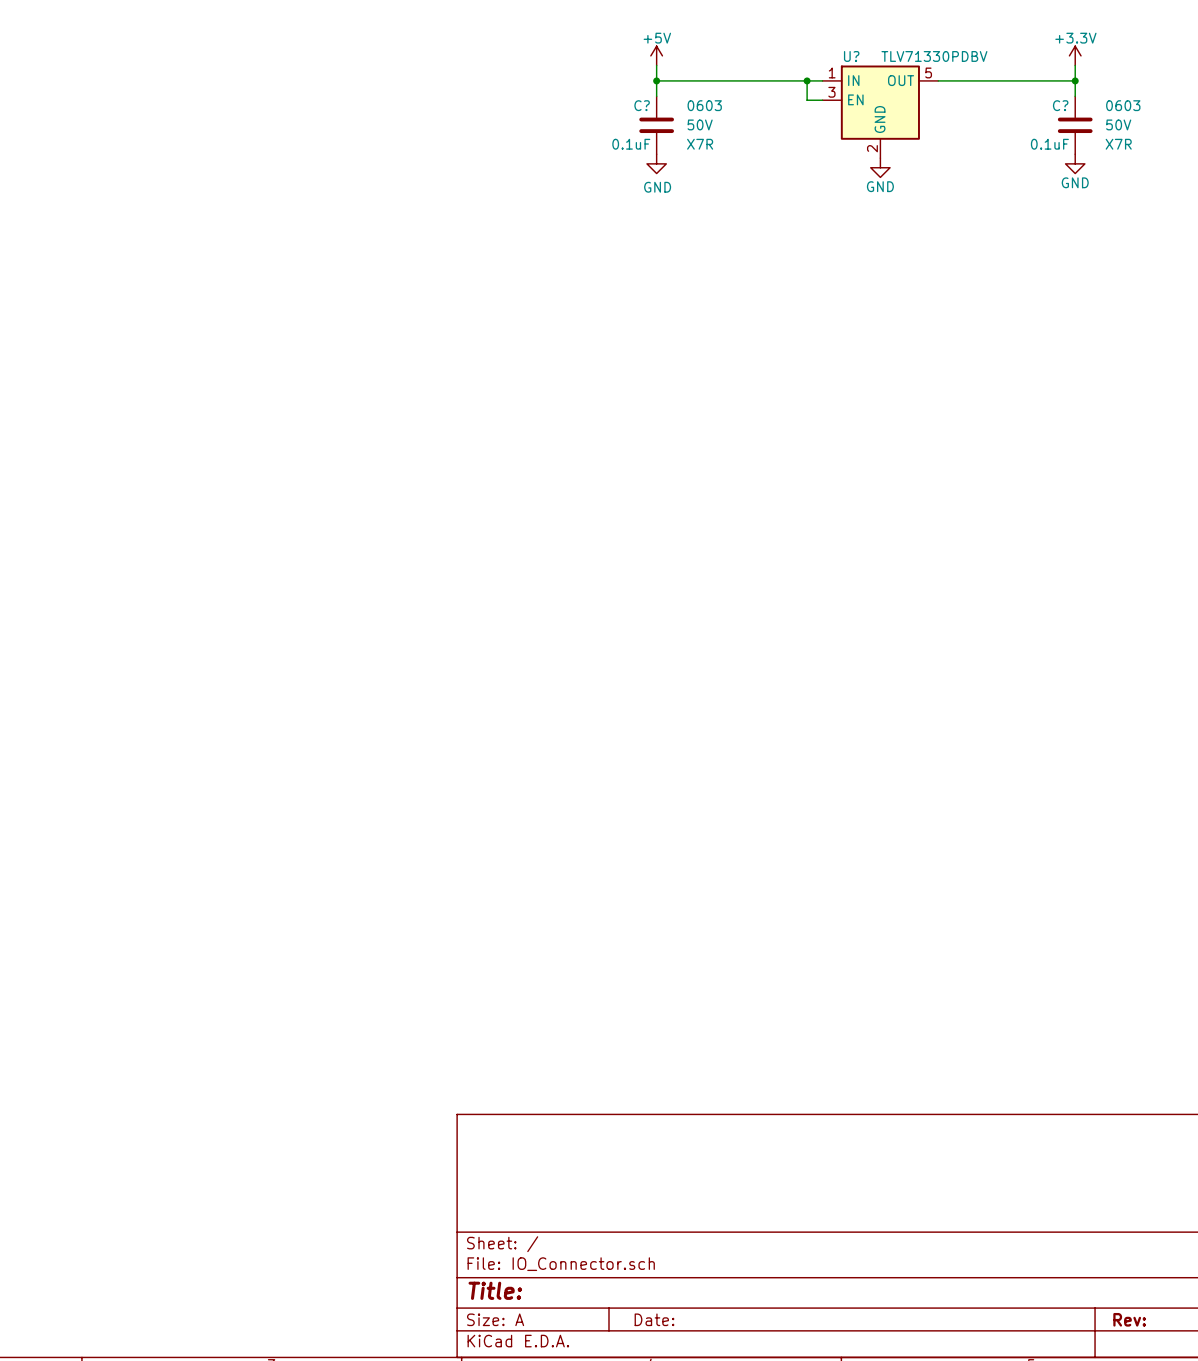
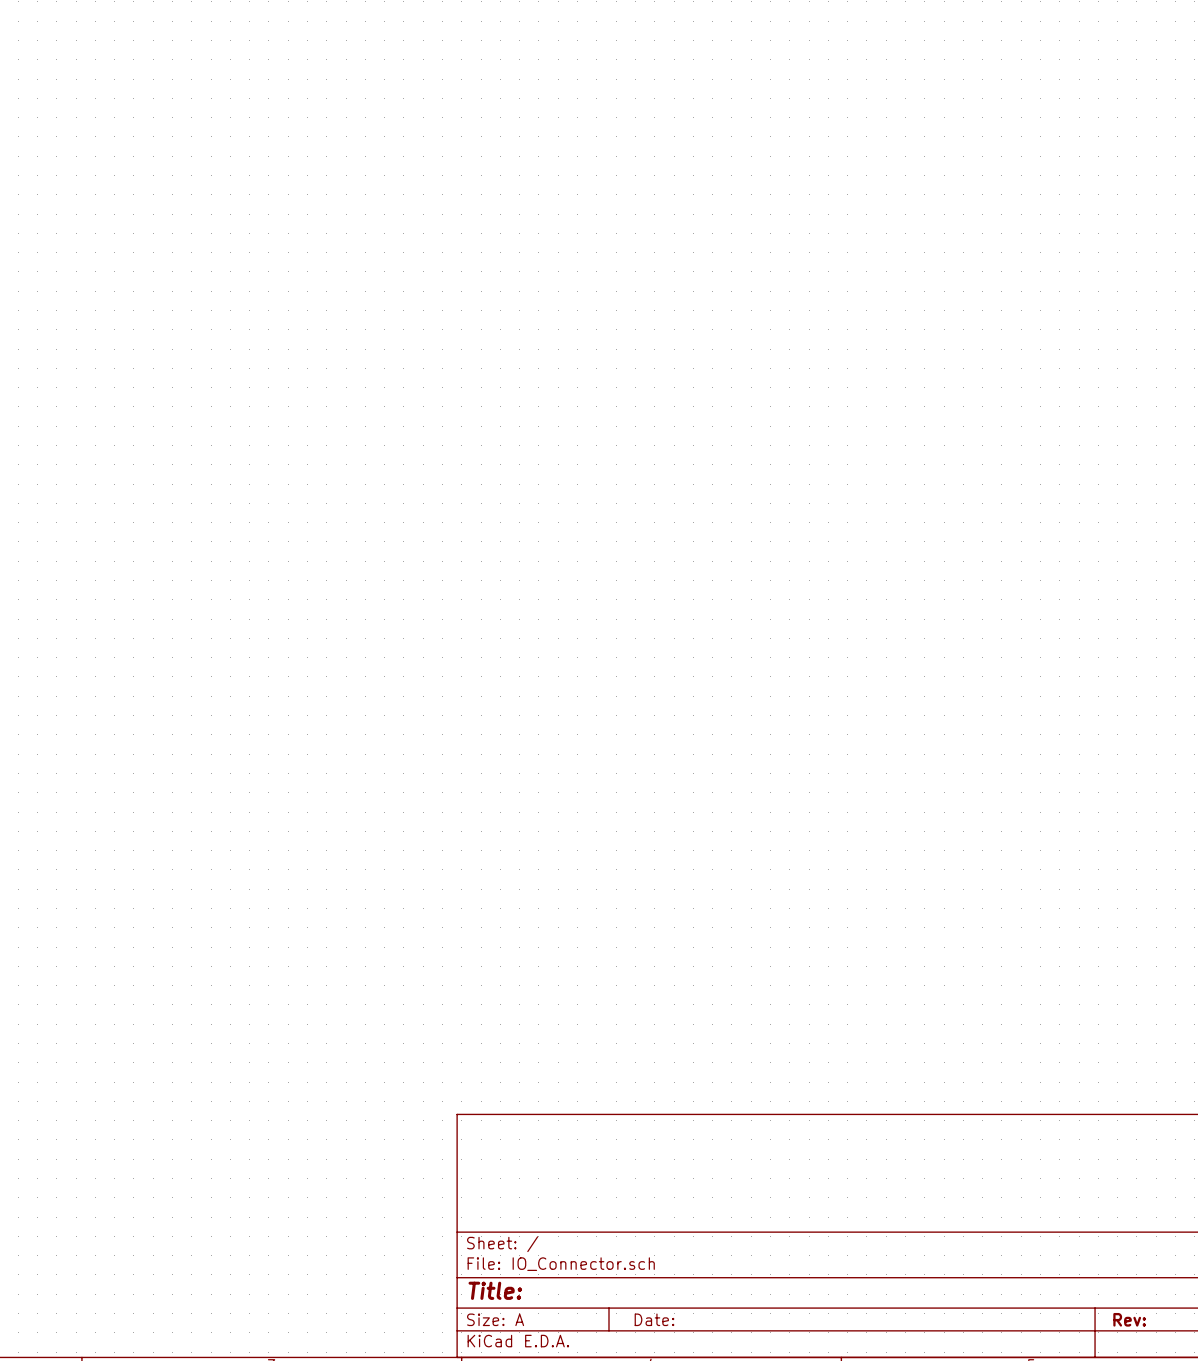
power symbol: +5V (656, 55) -> none
power symbol: +3.3V (1075, 55) -> none
wire: (656, 65) (656, 96) -> none
wire: (1075, 65) (1075, 96) -> none
wire: (656, 80) (822, 80) -> none
junction: (656, 80) -> none
wire: (807, 80) (807, 100) (822, 100) -> none
junction: (807, 80) -> none
wire: (938, 80) (1075, 80) -> none
junction: (1075, 80) -> none
U?: TLV71330PDBV (880, 111) -> none
C?: 0.1uF (656, 125) -> none
C?: 0.1uF (1075, 125) -> none
power symbol: GND (656, 163) -> none
power symbol: GND (1075, 163) -> none
power symbol: GND (880, 167) -> none

